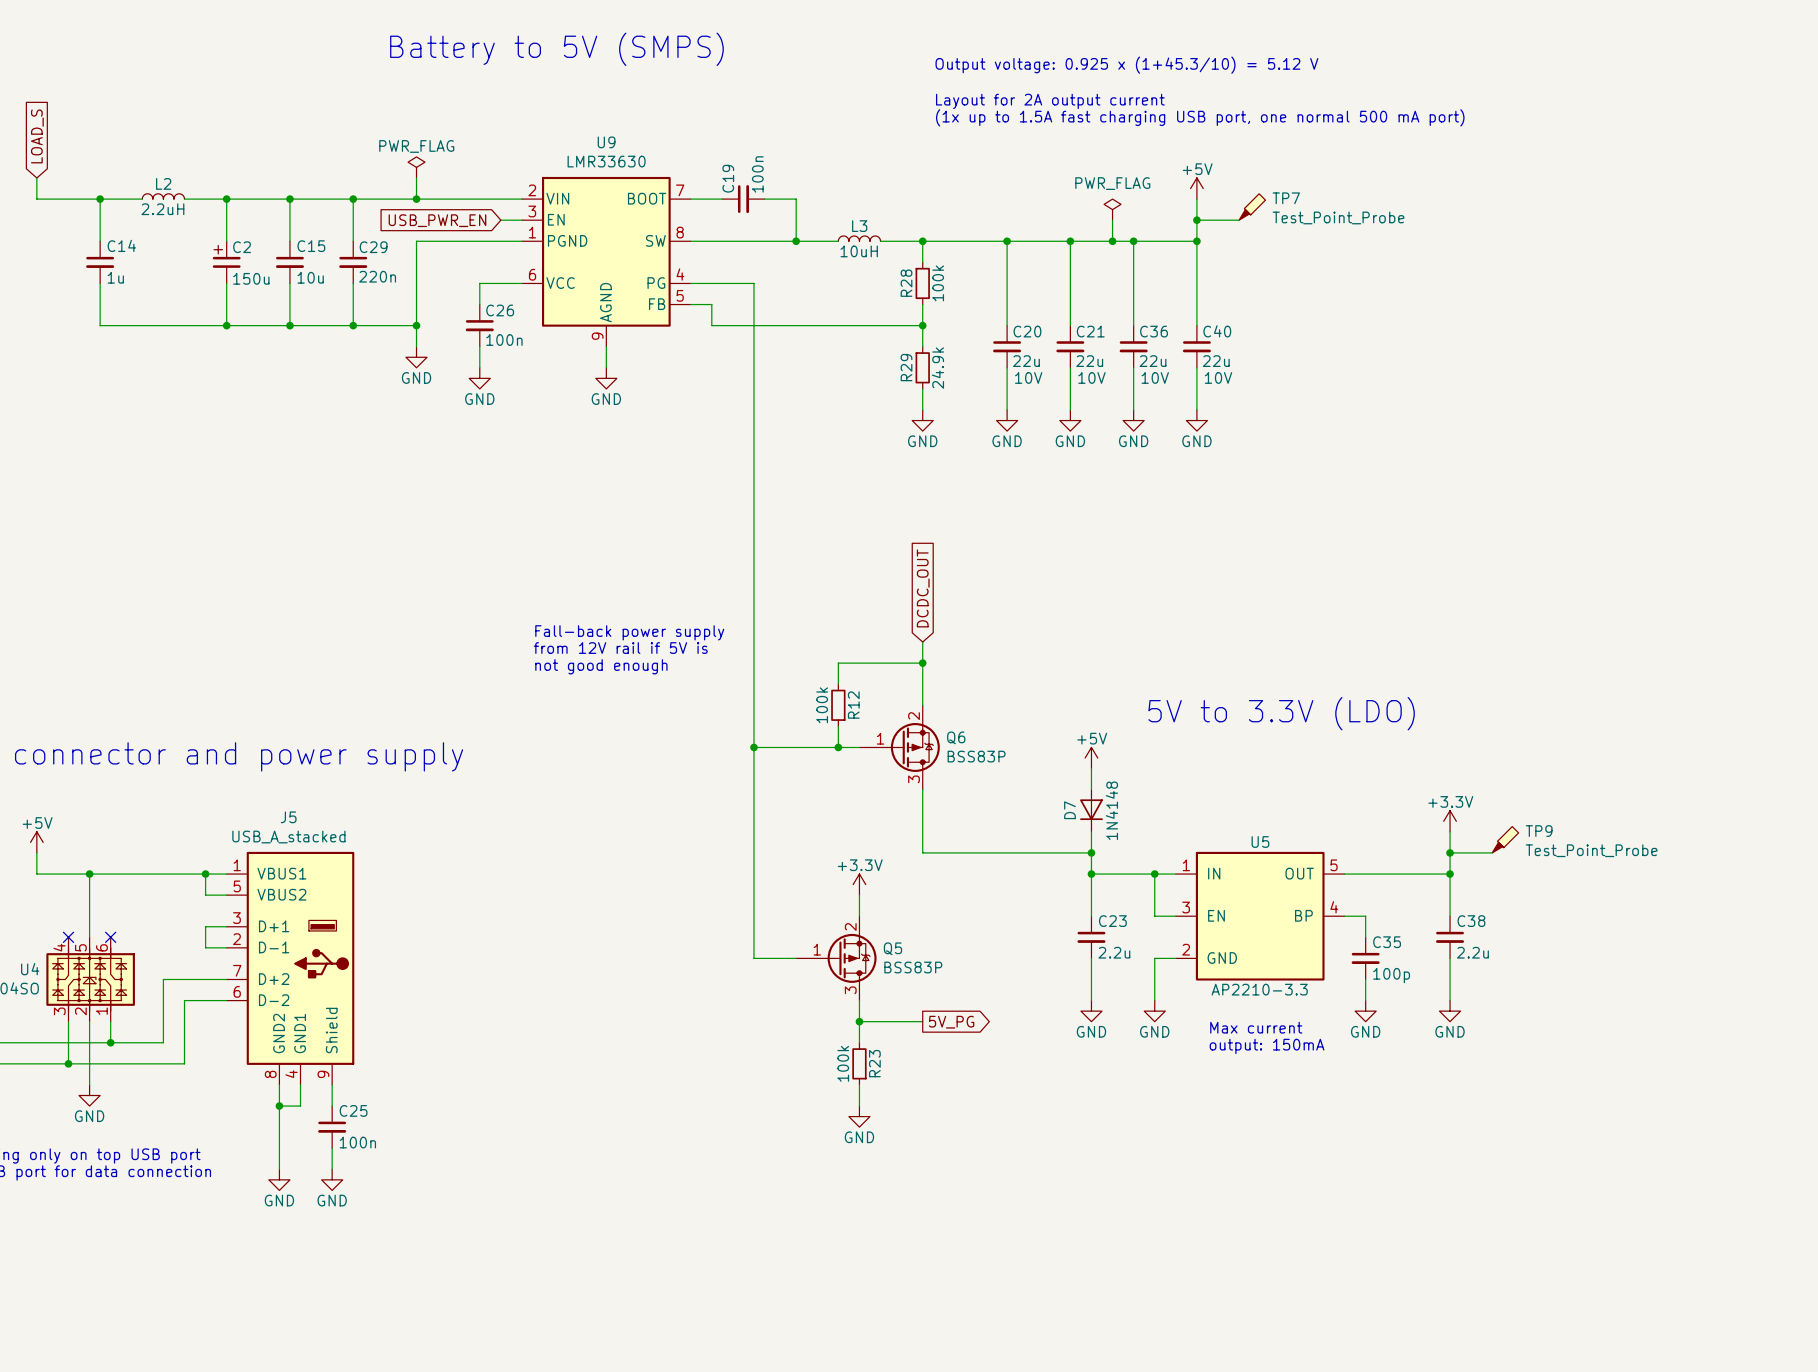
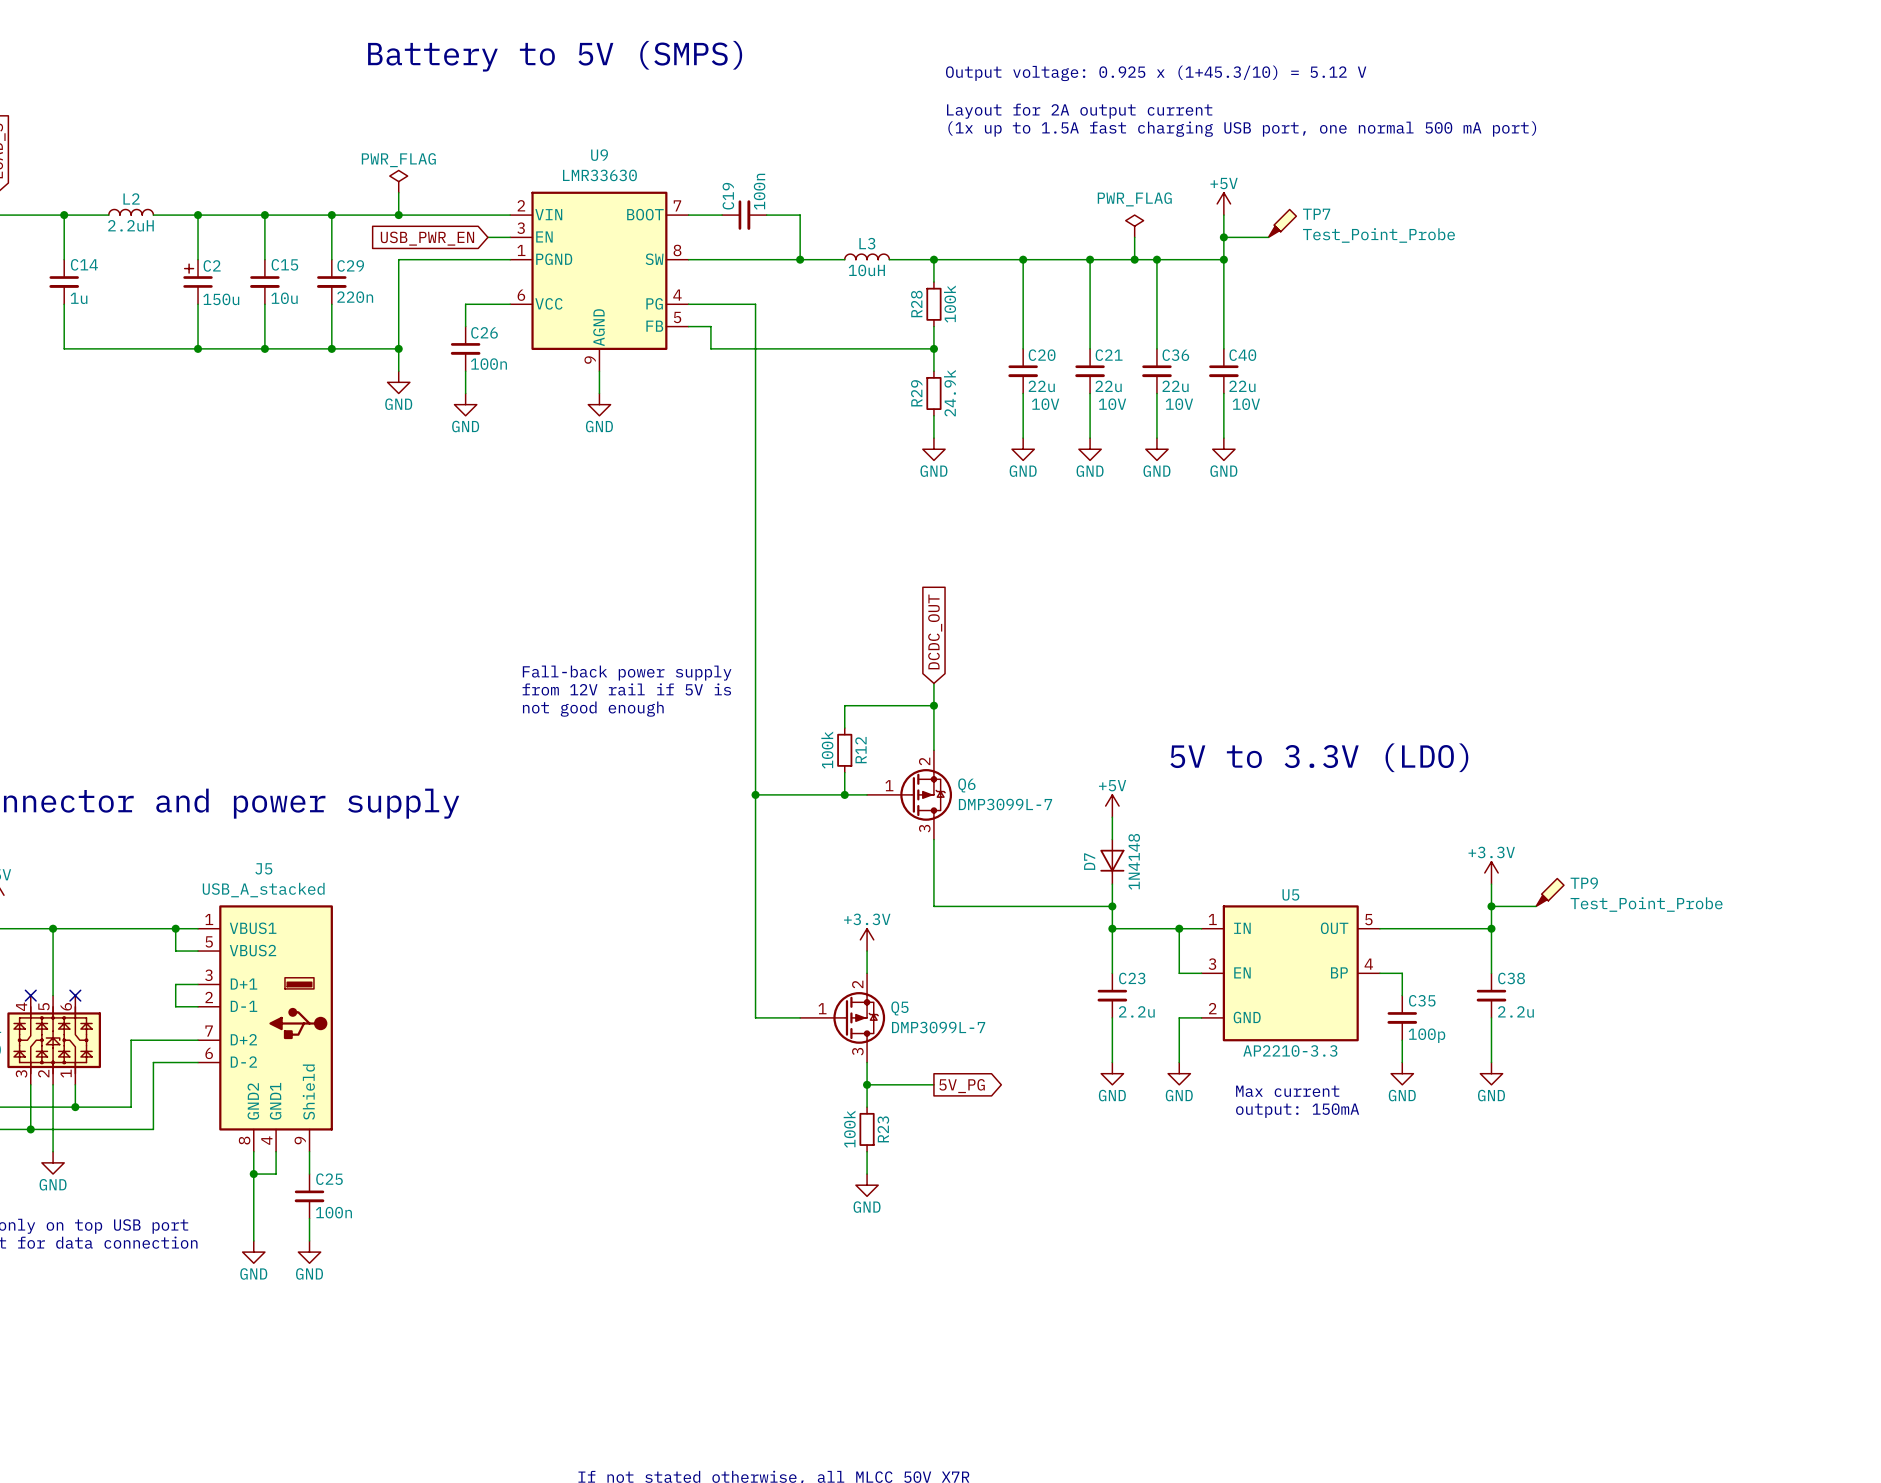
Q6 value: BSS83P (976, 756) -> DMP3099L-7 (1005, 804)
Q5 value: BSS83P (913, 967) -> DMP3099L-7 (938, 1027)

